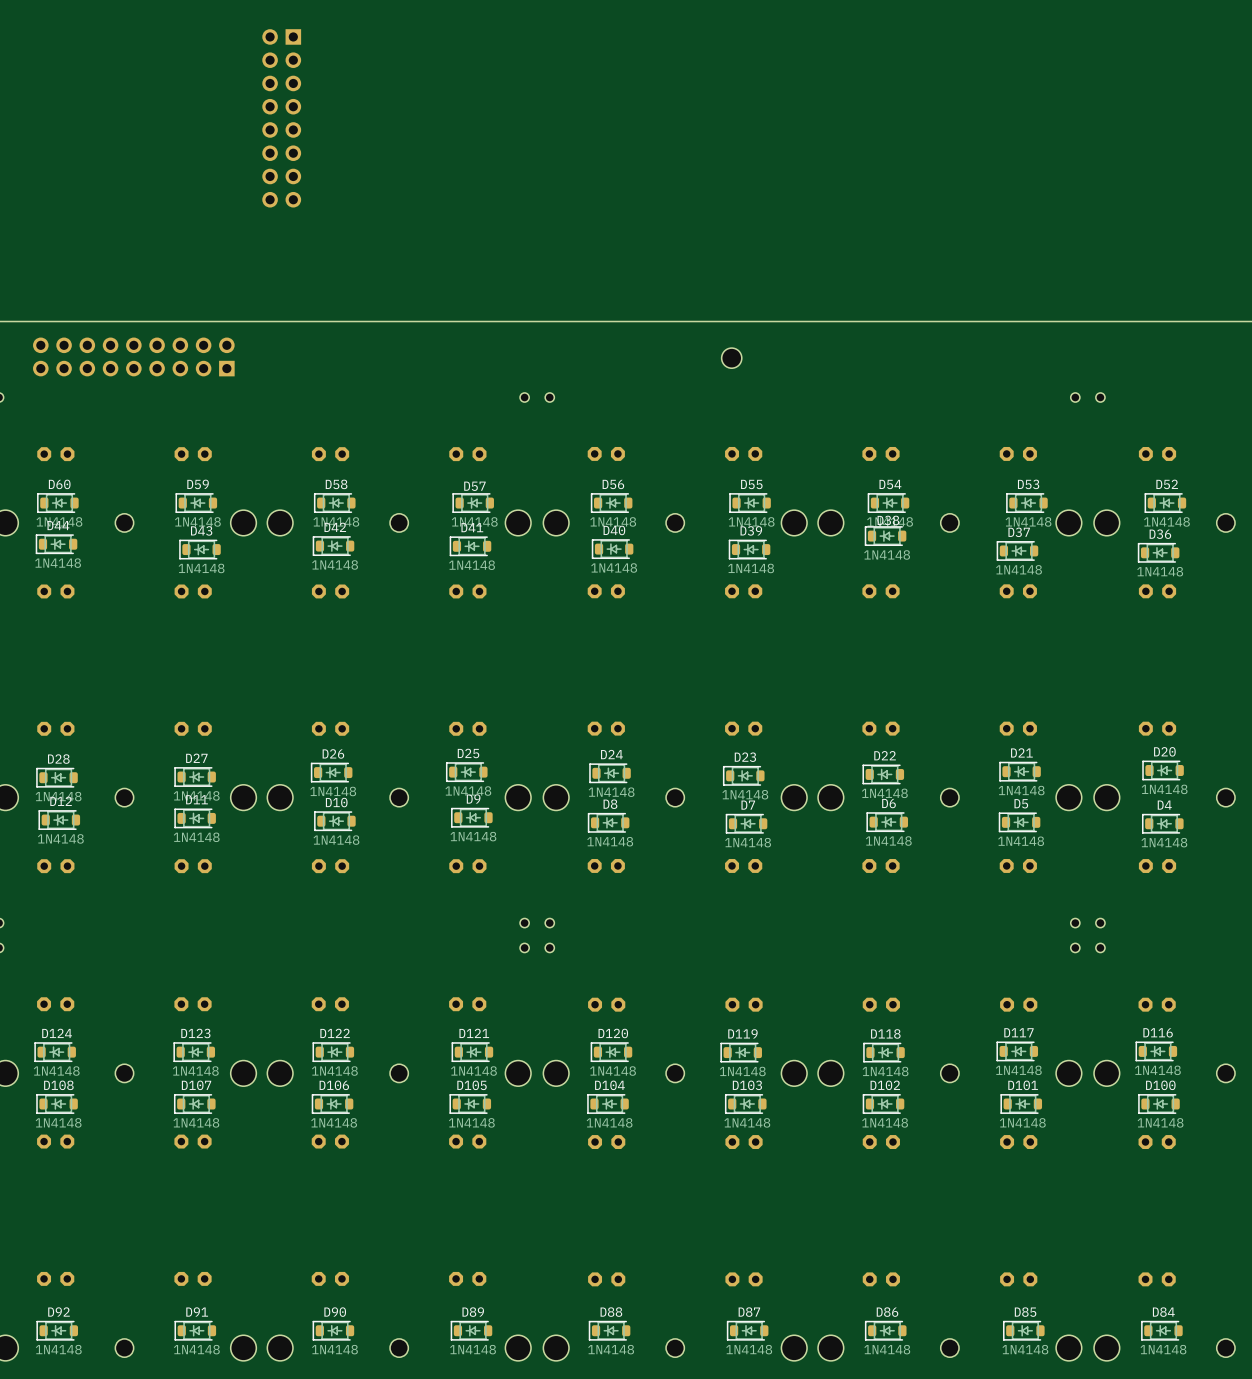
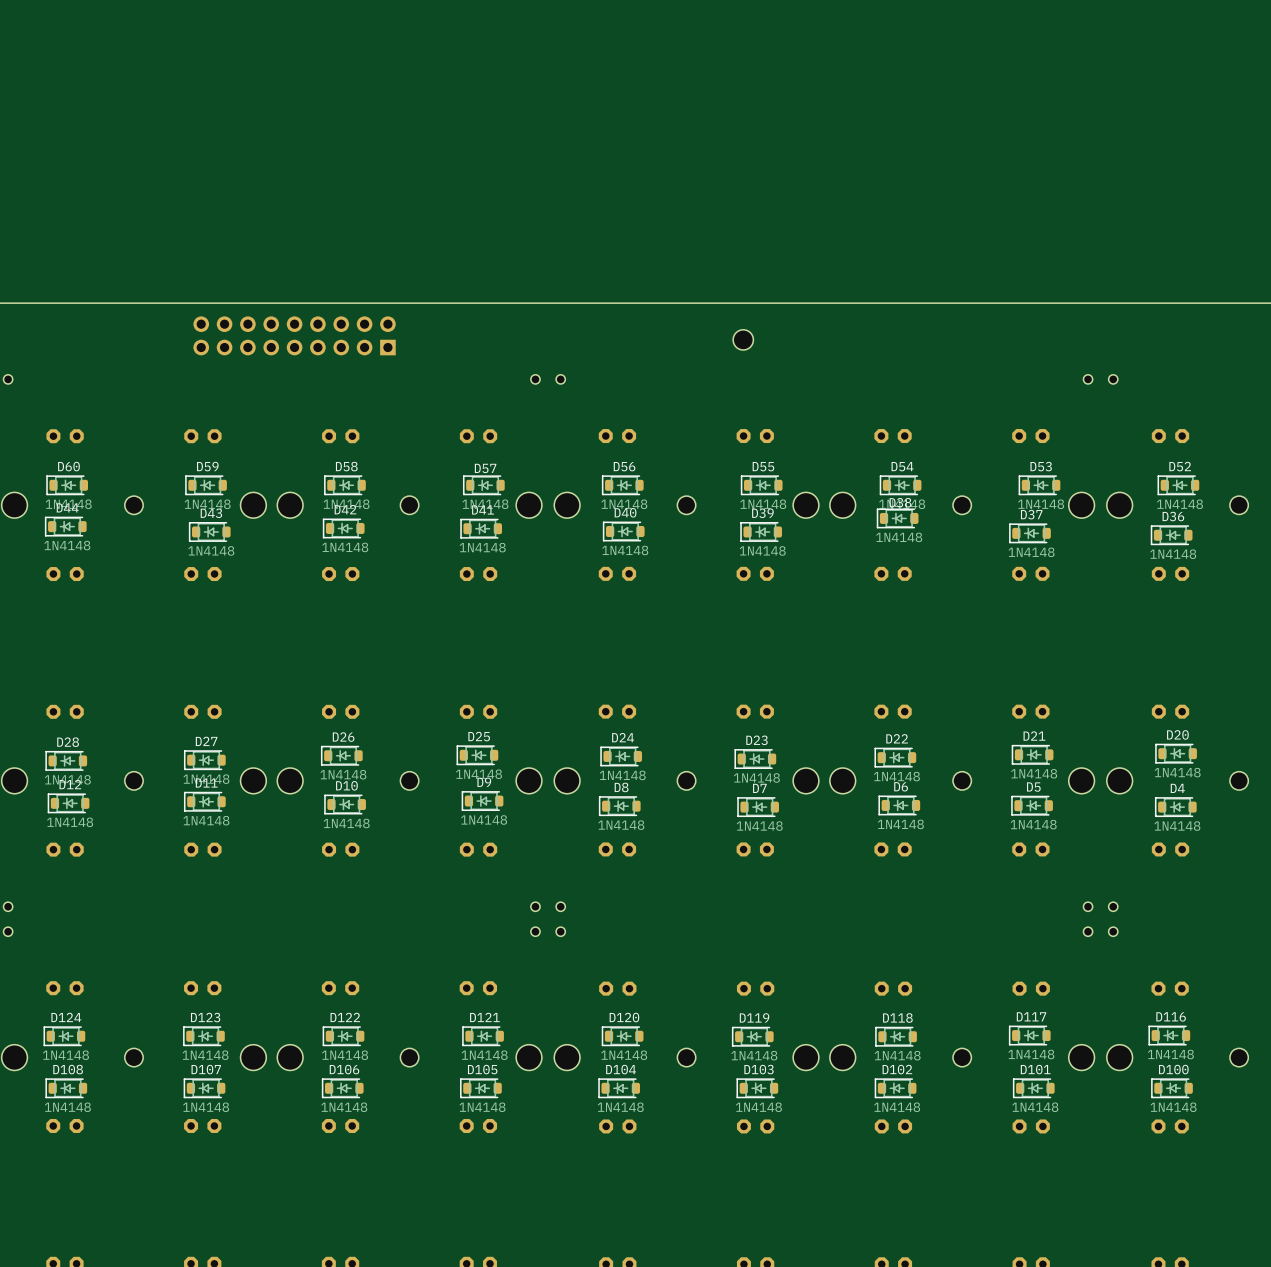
part: (281, 118) -> none
part position: (133, 356) -> (294, 335)

